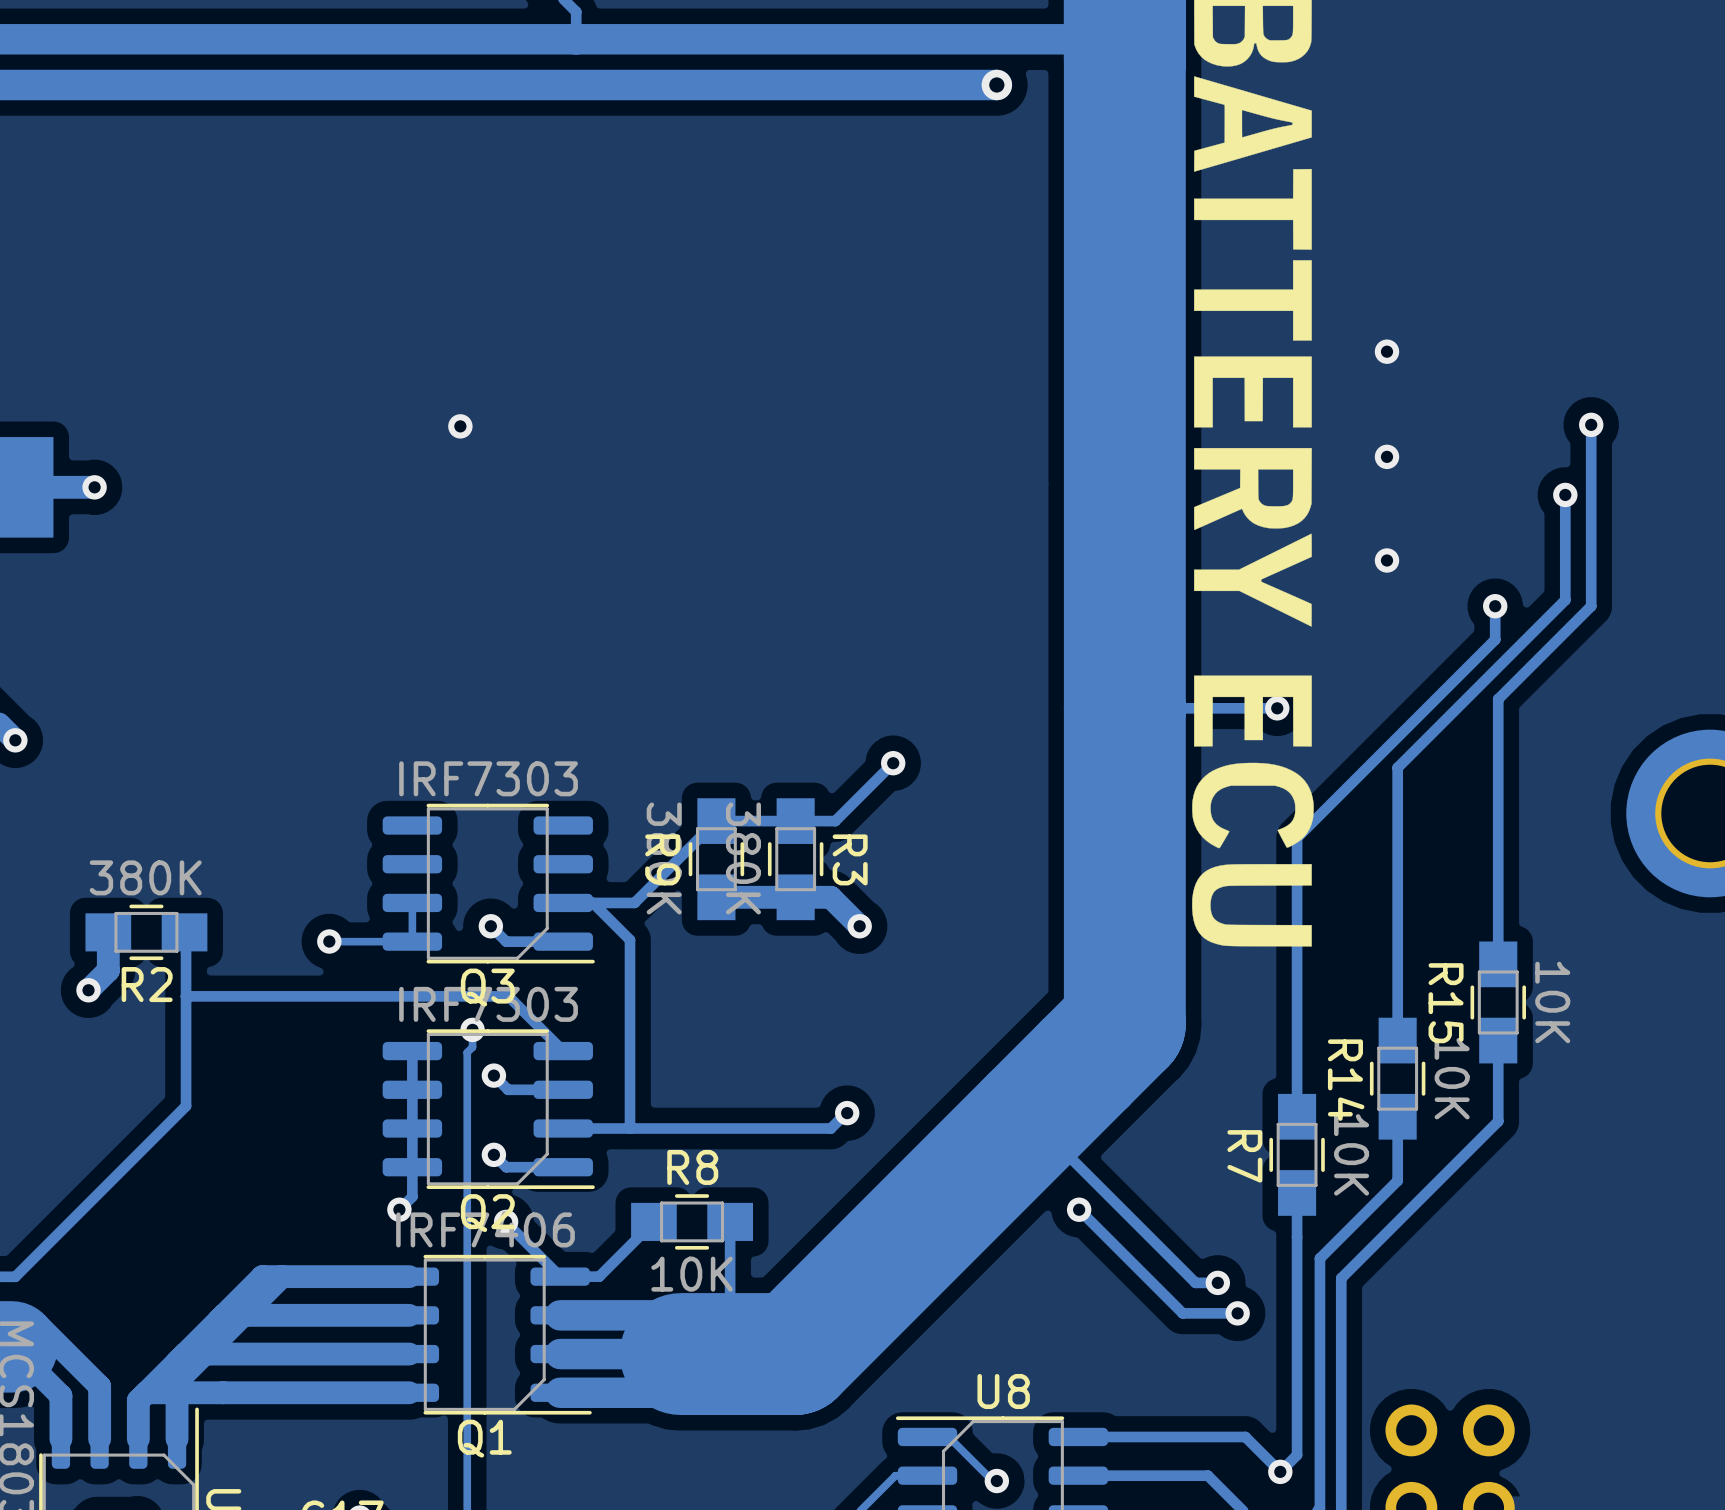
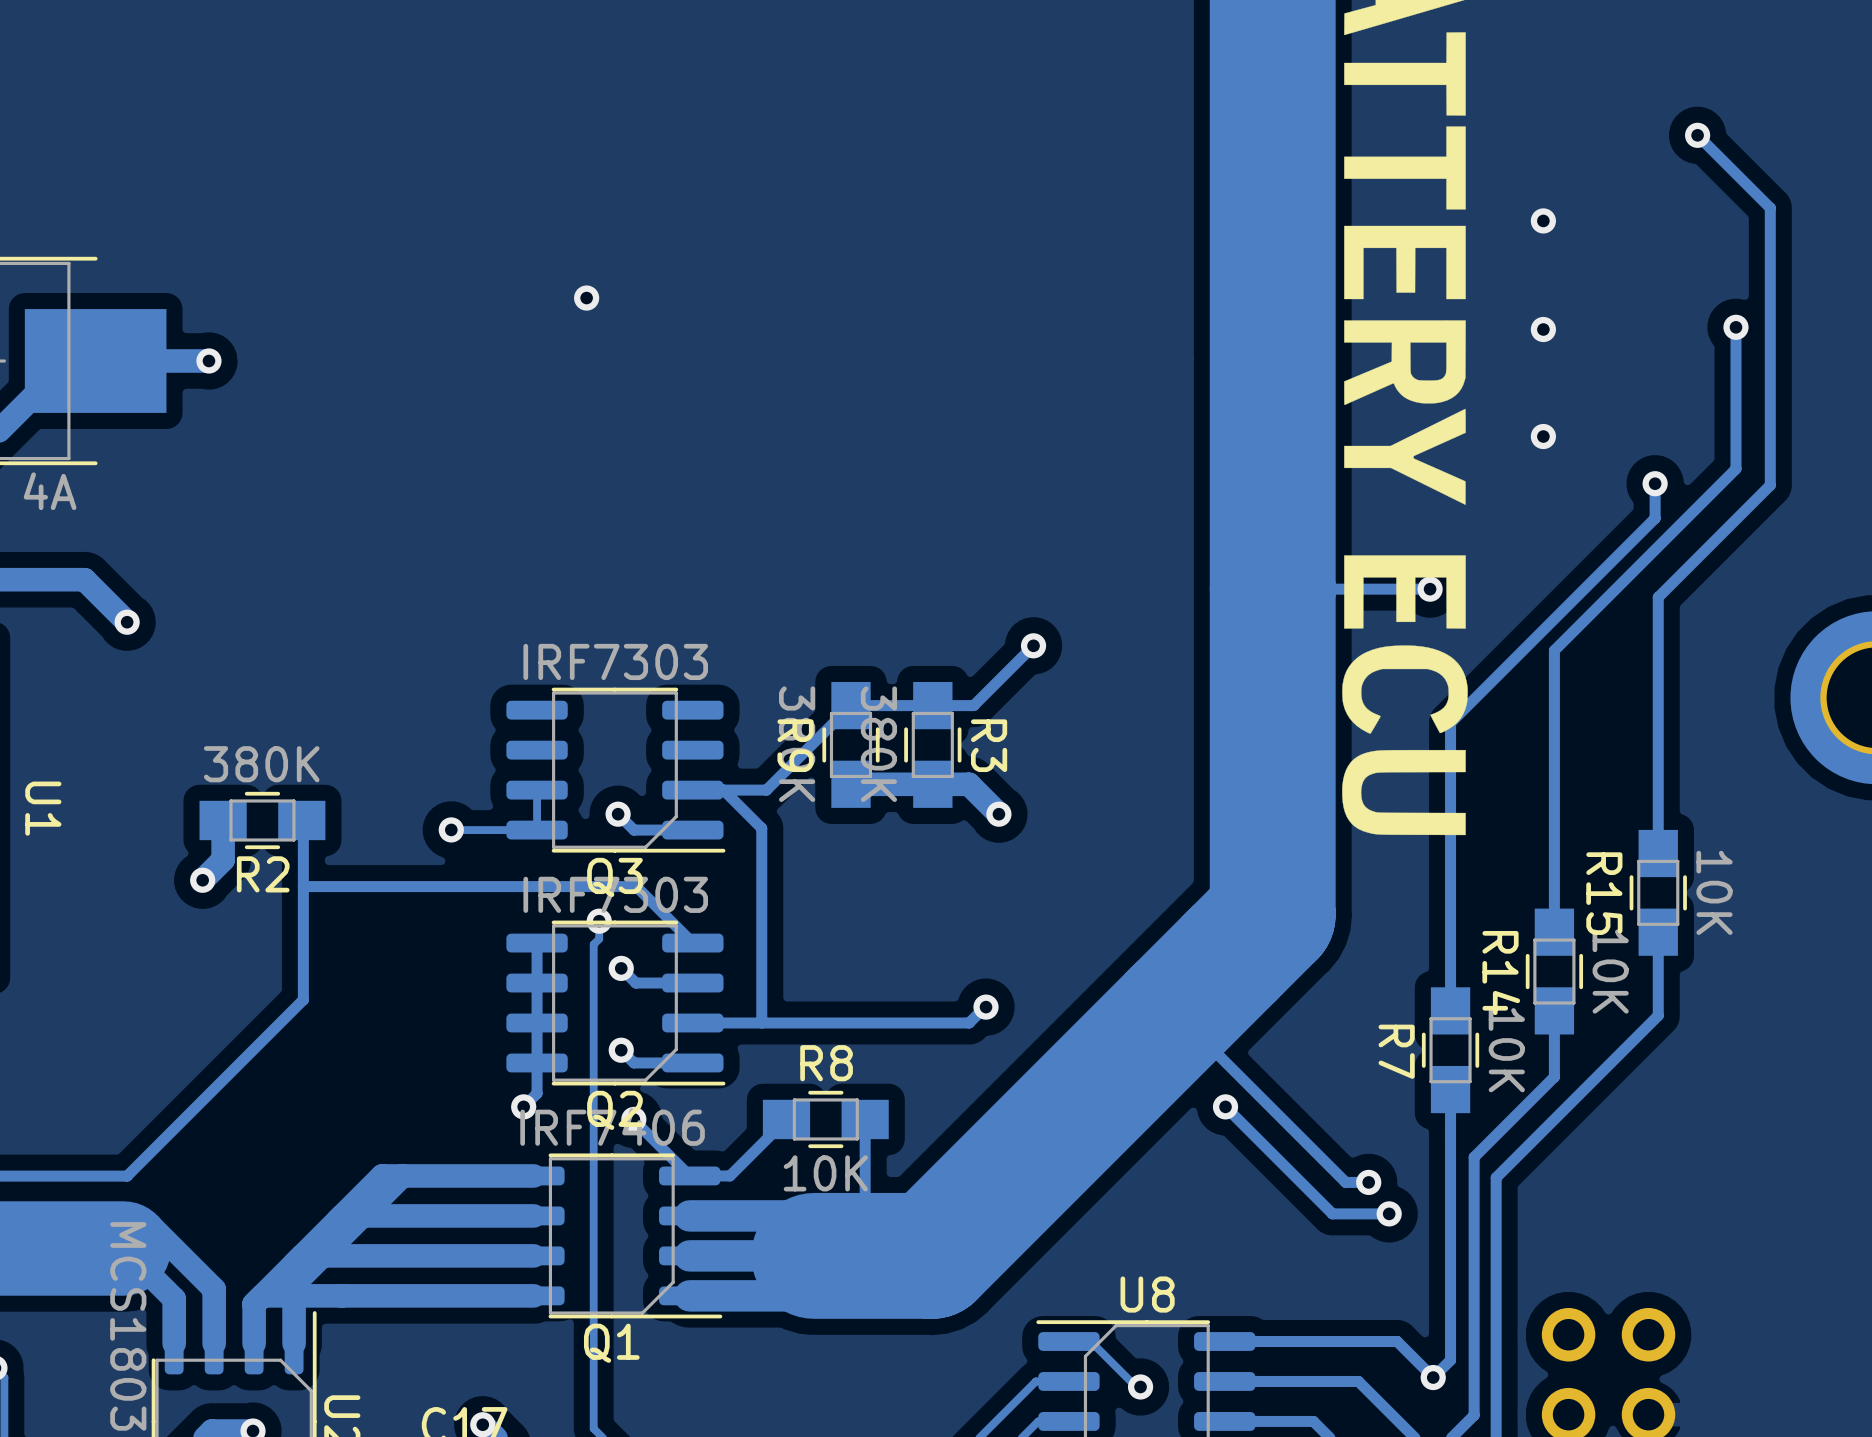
via: none -> (1697, 135)
track: (1591, 424) (1591, 606) (1498, 699) (1498, 716) -> (1697, 135) (1770, 208) (1770, 485) (1658, 597)
via: (1591, 424) -> none
via: none -> (1736, 327)
track: (1565, 494) (1565, 600) -> (1736, 327) (1736, 468) (1727, 477)
via: (1565, 494) -> none

